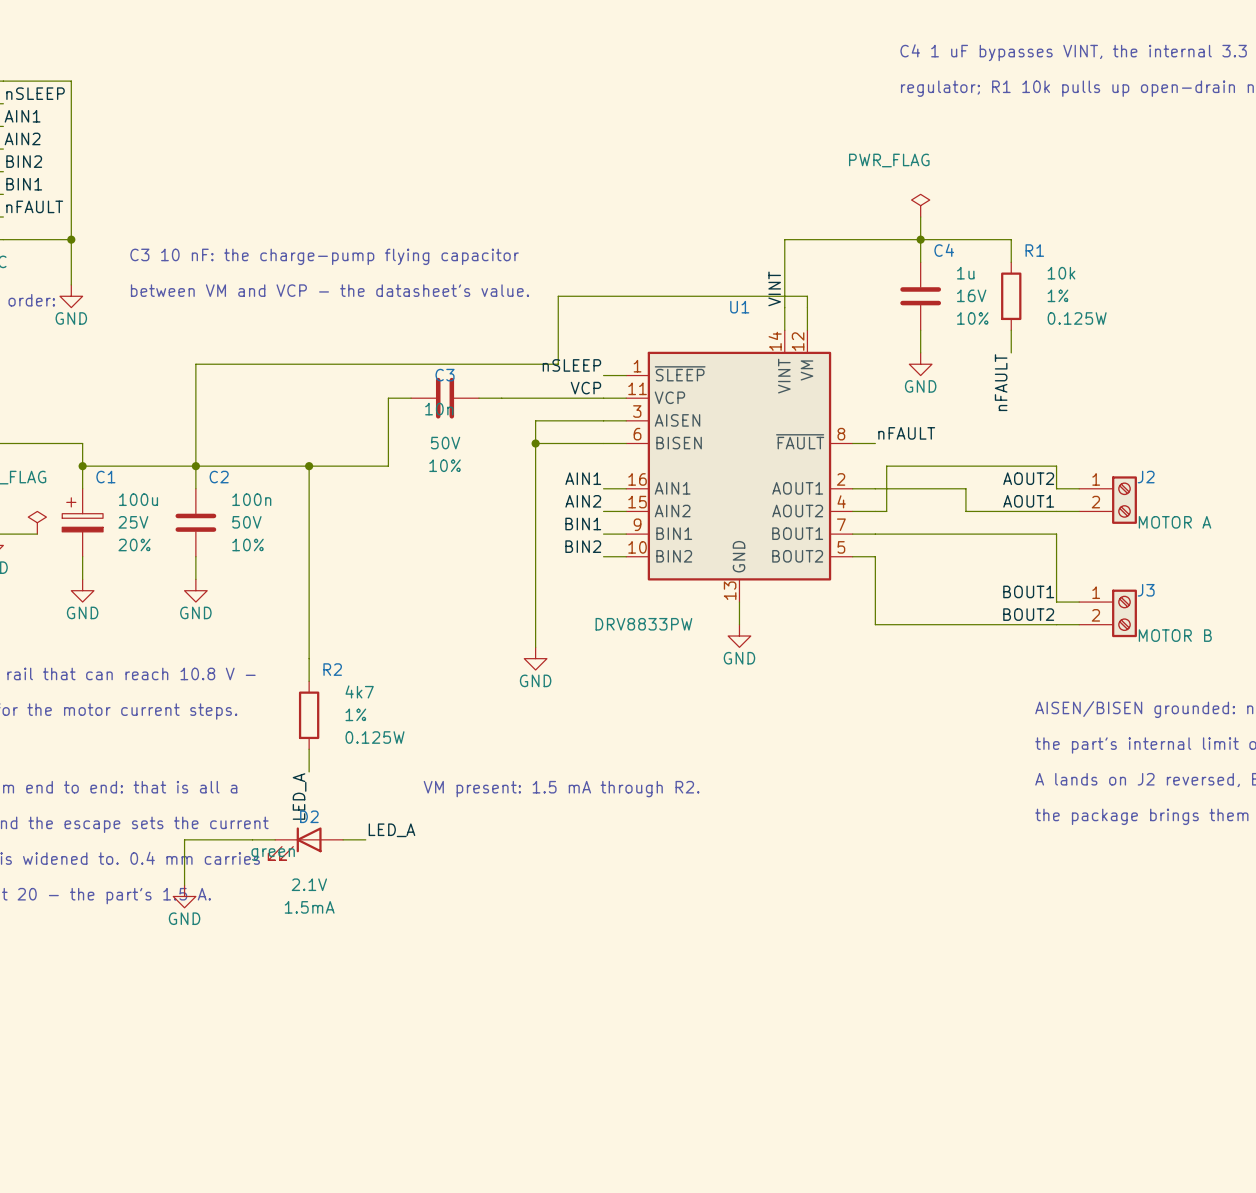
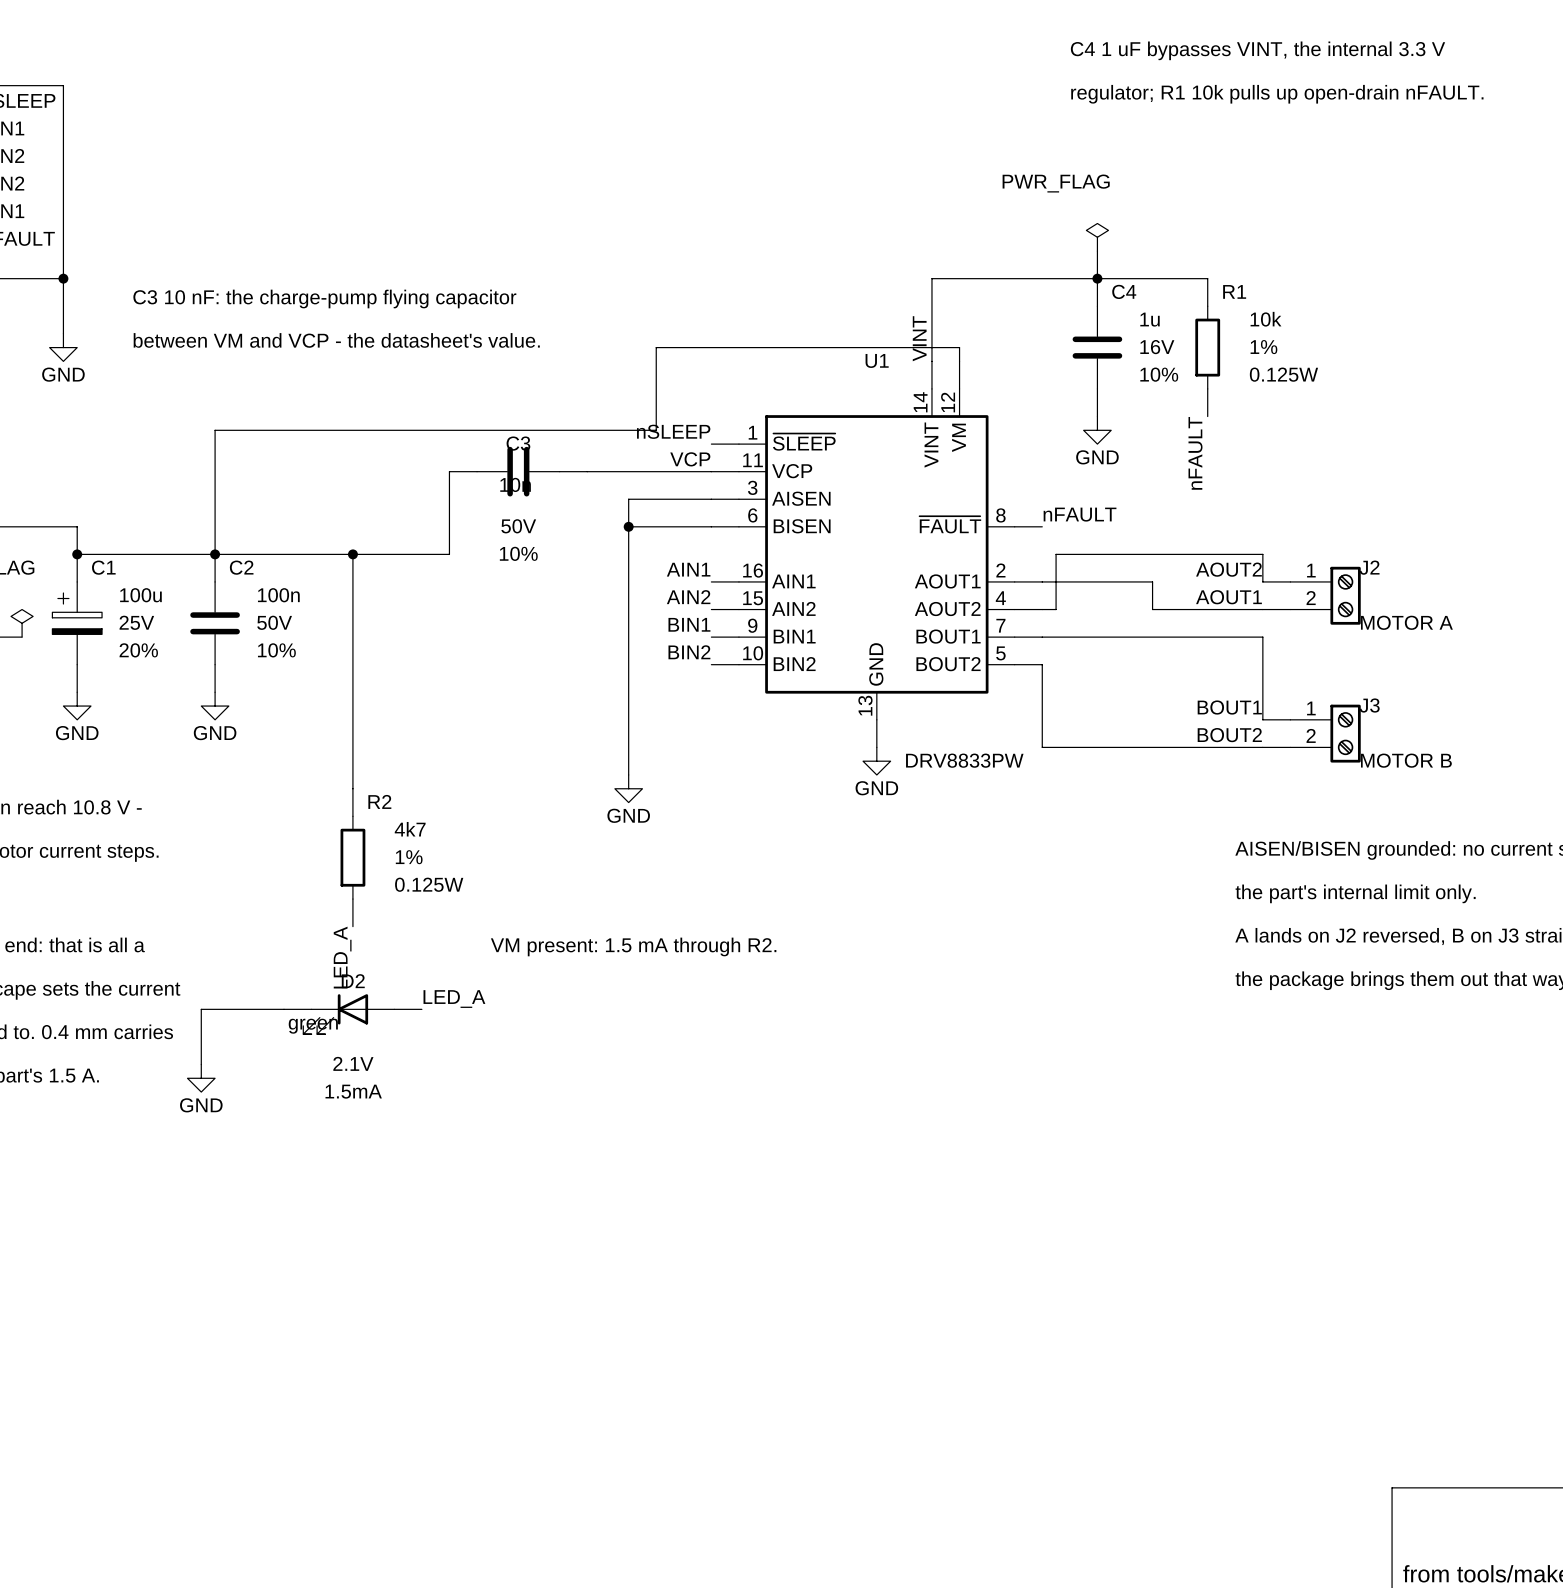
U1 value position: DRV8833PW (643, 624) -> DRV8833PW (964, 760)

